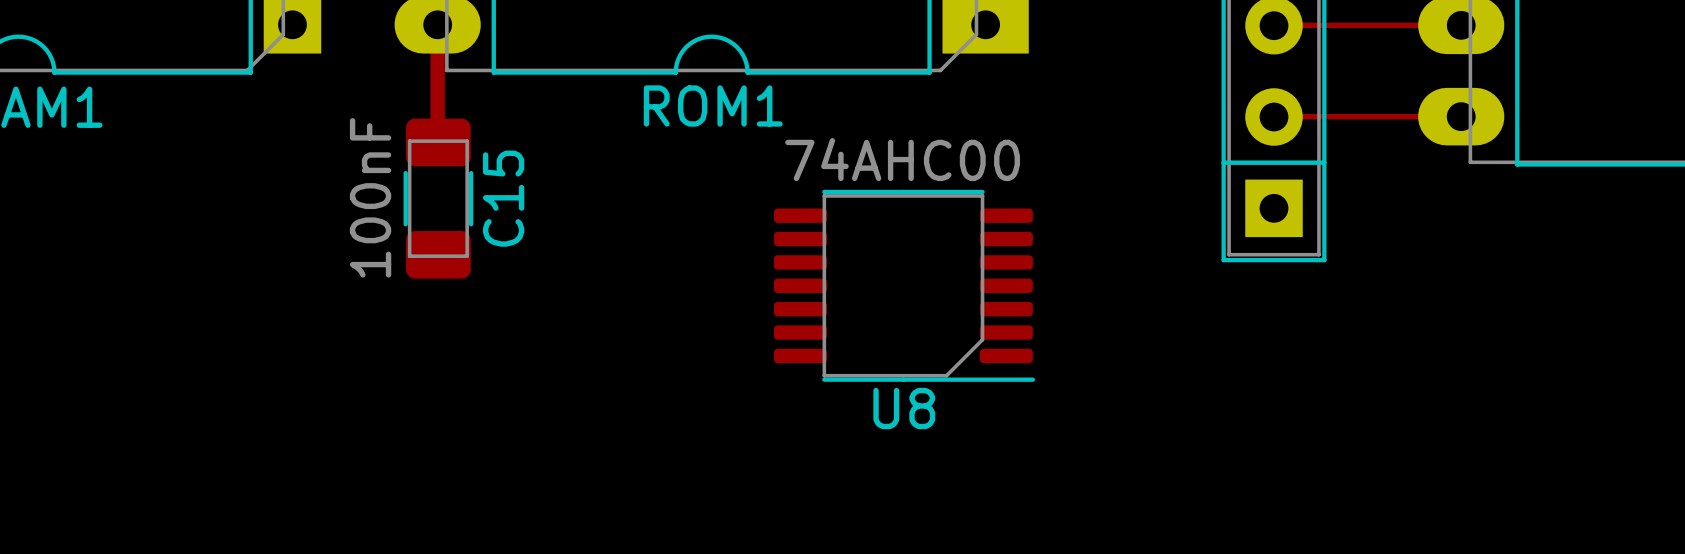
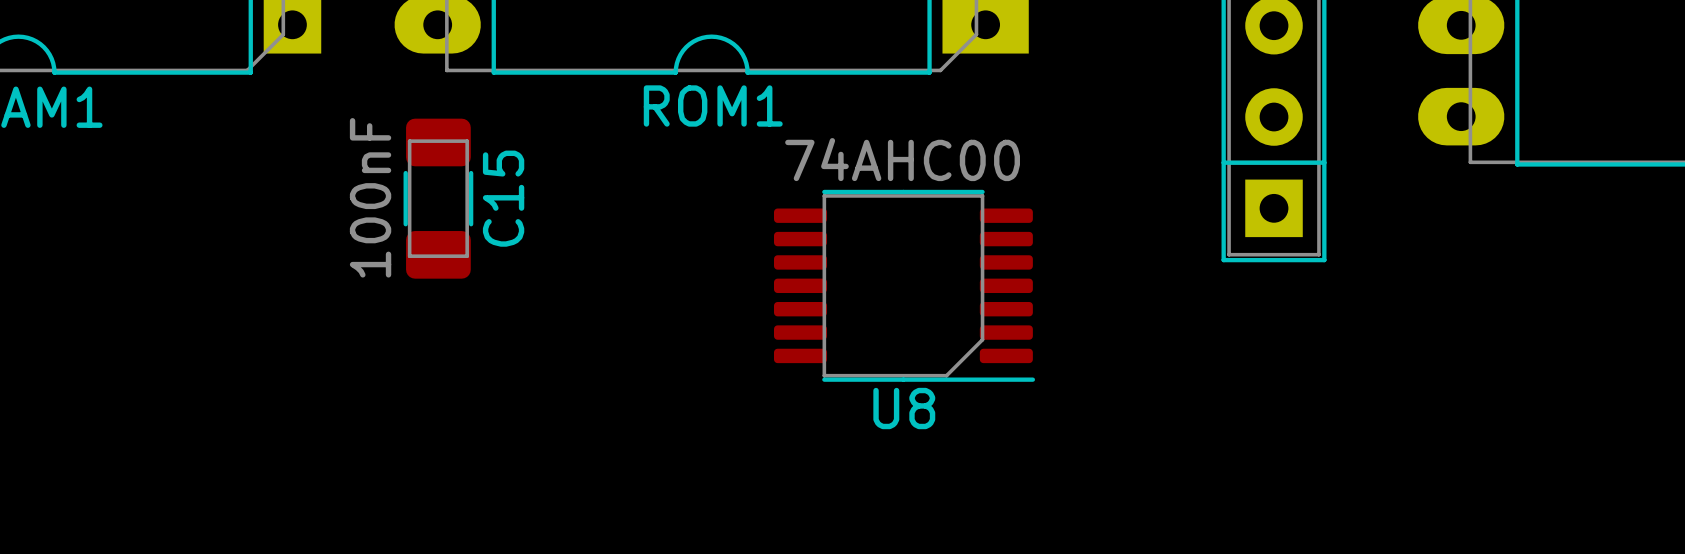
track: (437, 24) (438, 142) -> none
track: (1461, 25) (1278, 25) (1274, 30) -> none
track: (1274, 116) (1461, 116) -> none

